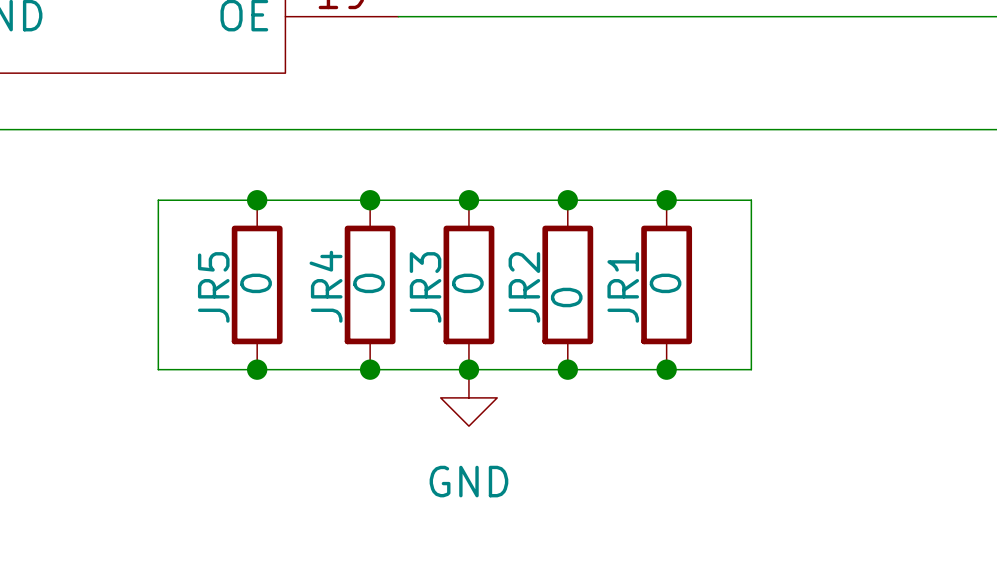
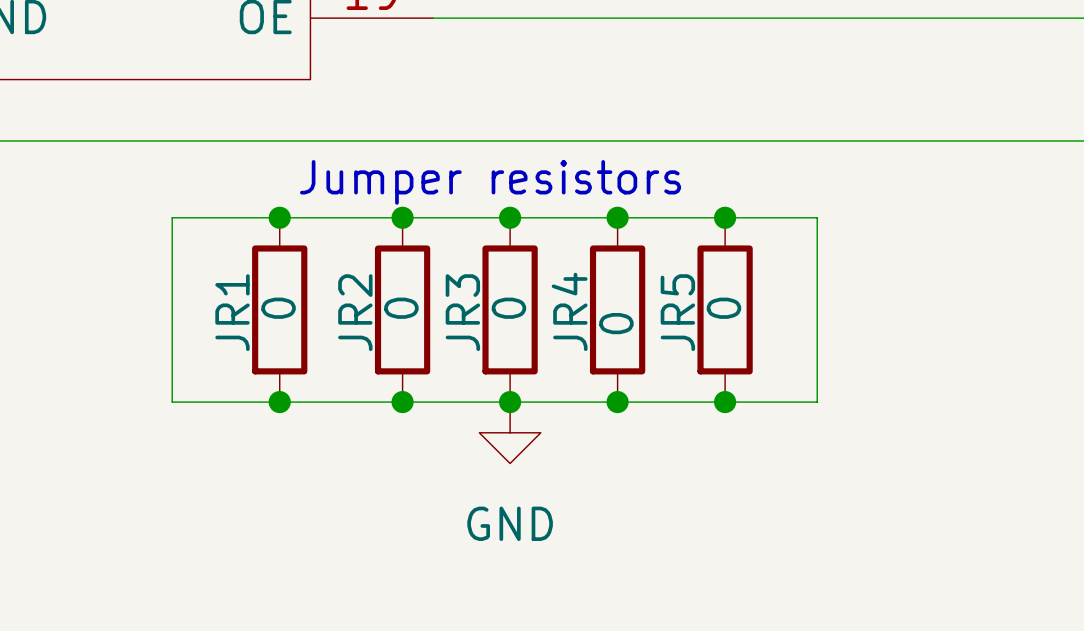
text: none -> Jumper resistors (490, 182)
JR4 name: JR4 (326, 286) -> JR2 (355, 312)
JR5 name: JR5 (213, 287) -> JR1 (232, 312)
JR2 name: JR2 (524, 287) -> JR4 (569, 311)
JR1 name: JR1 (623, 287) -> JR5 (677, 312)

